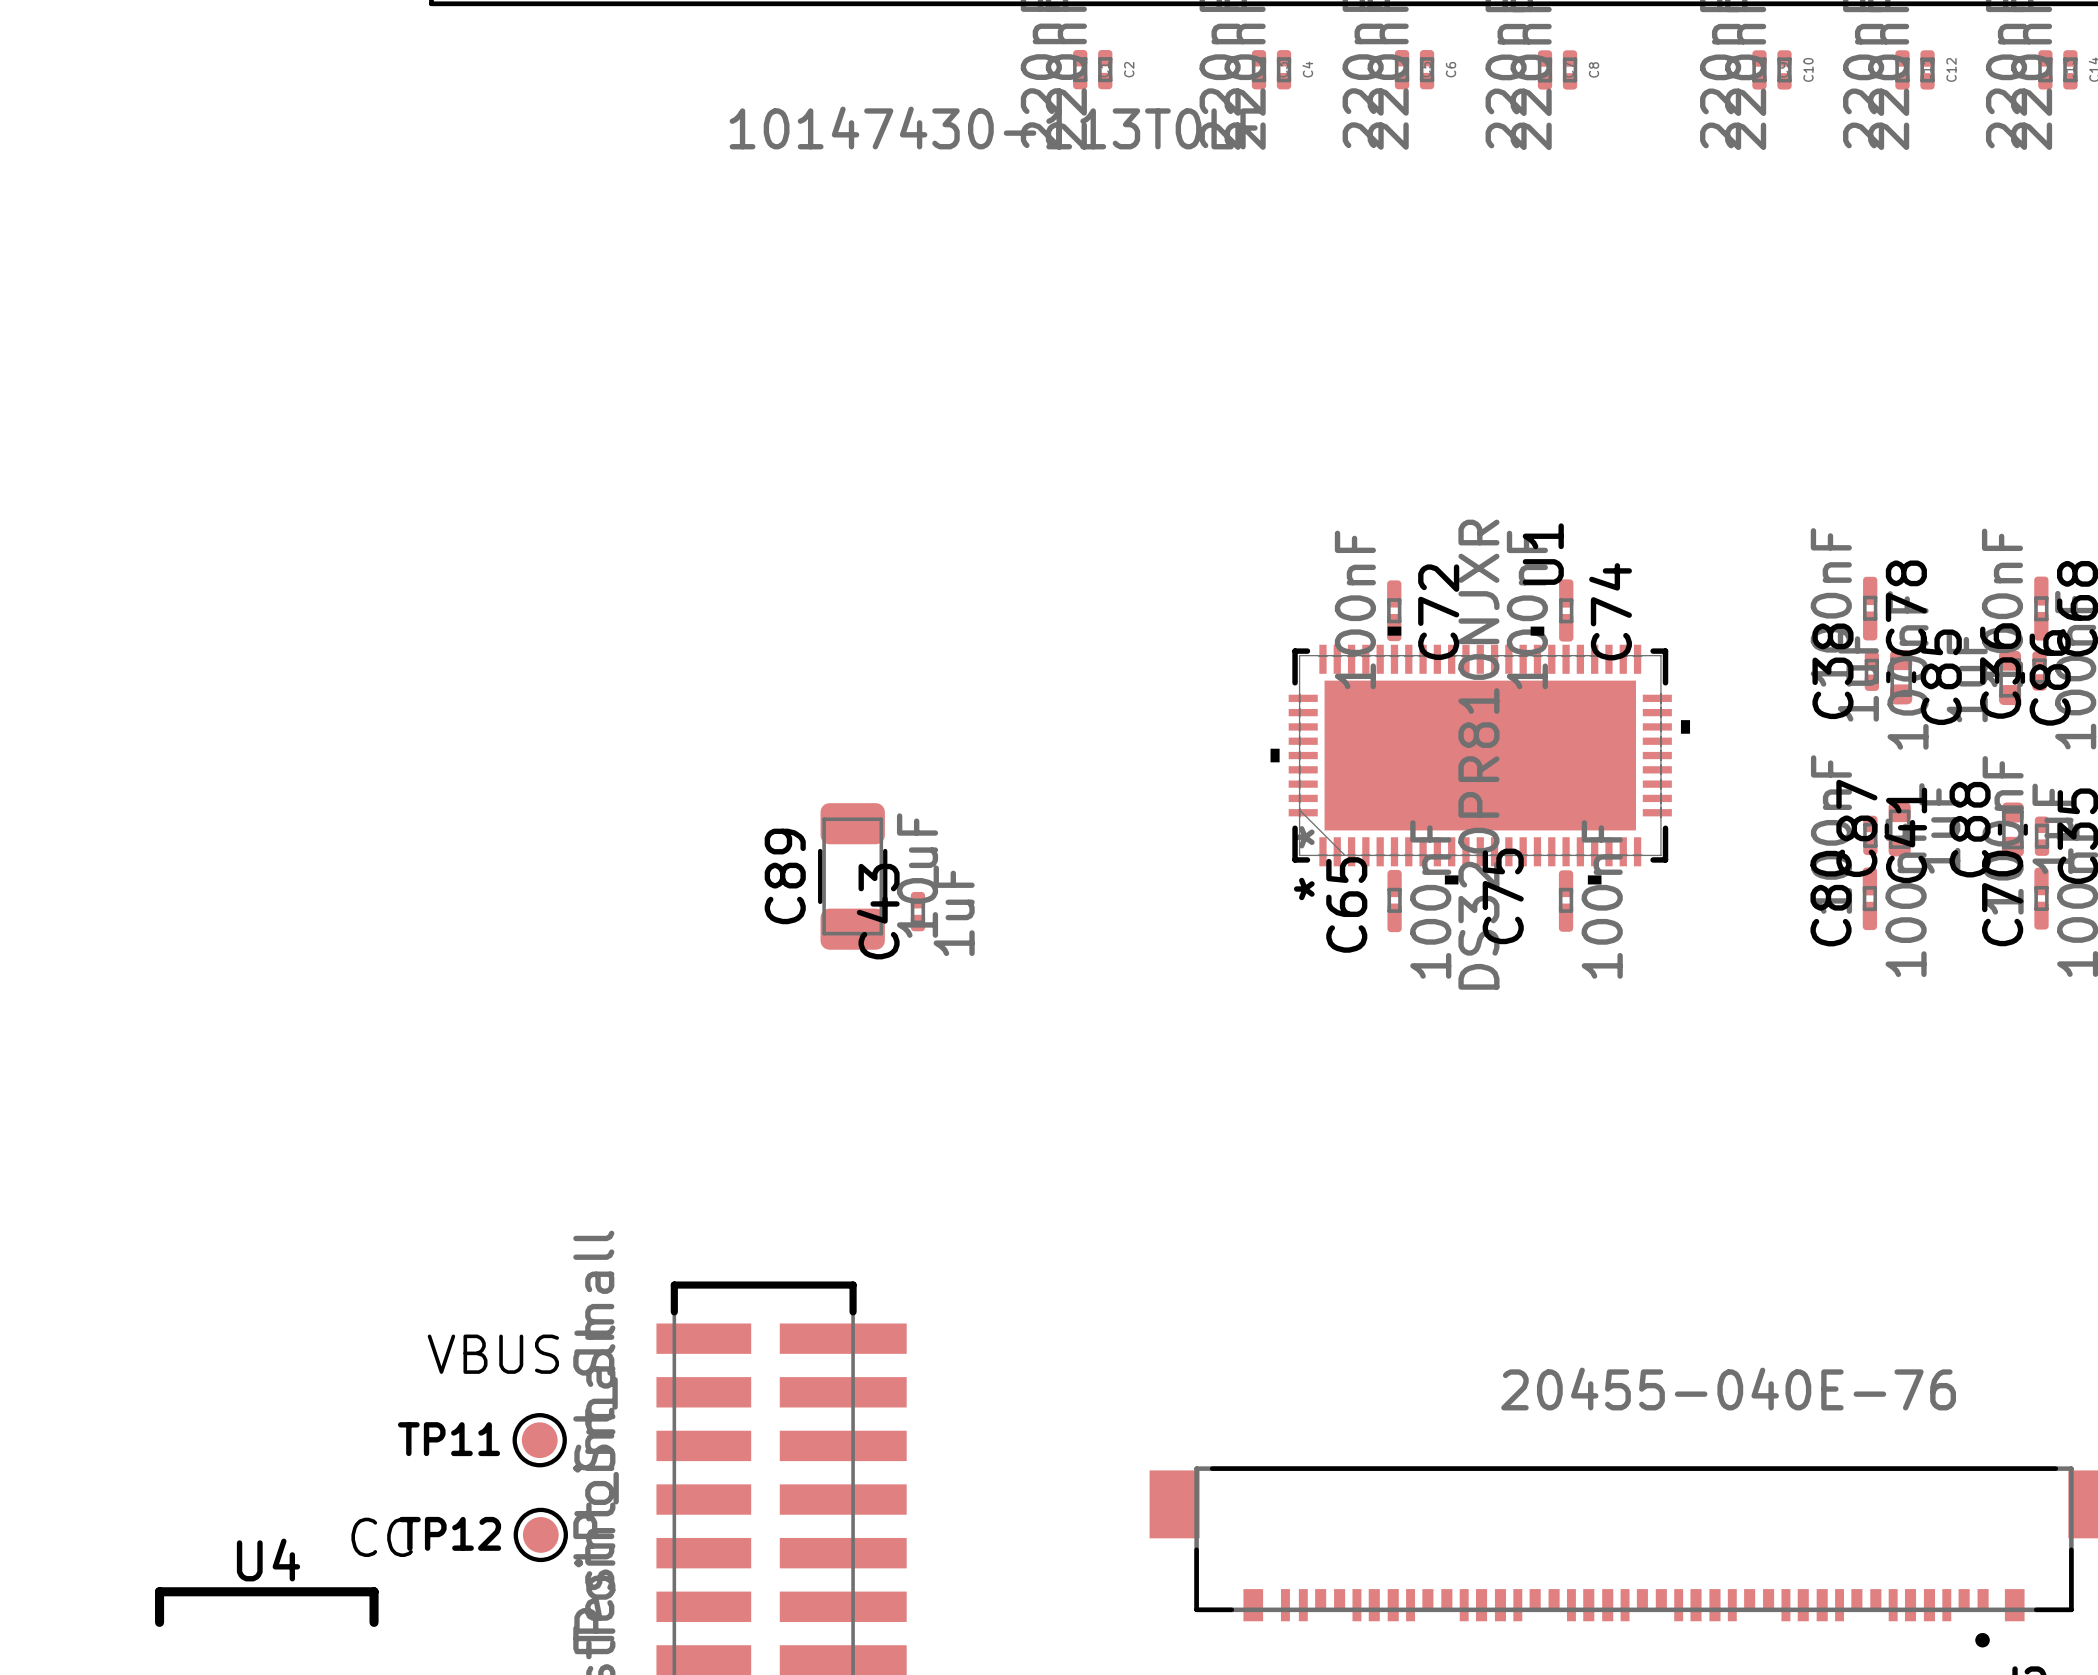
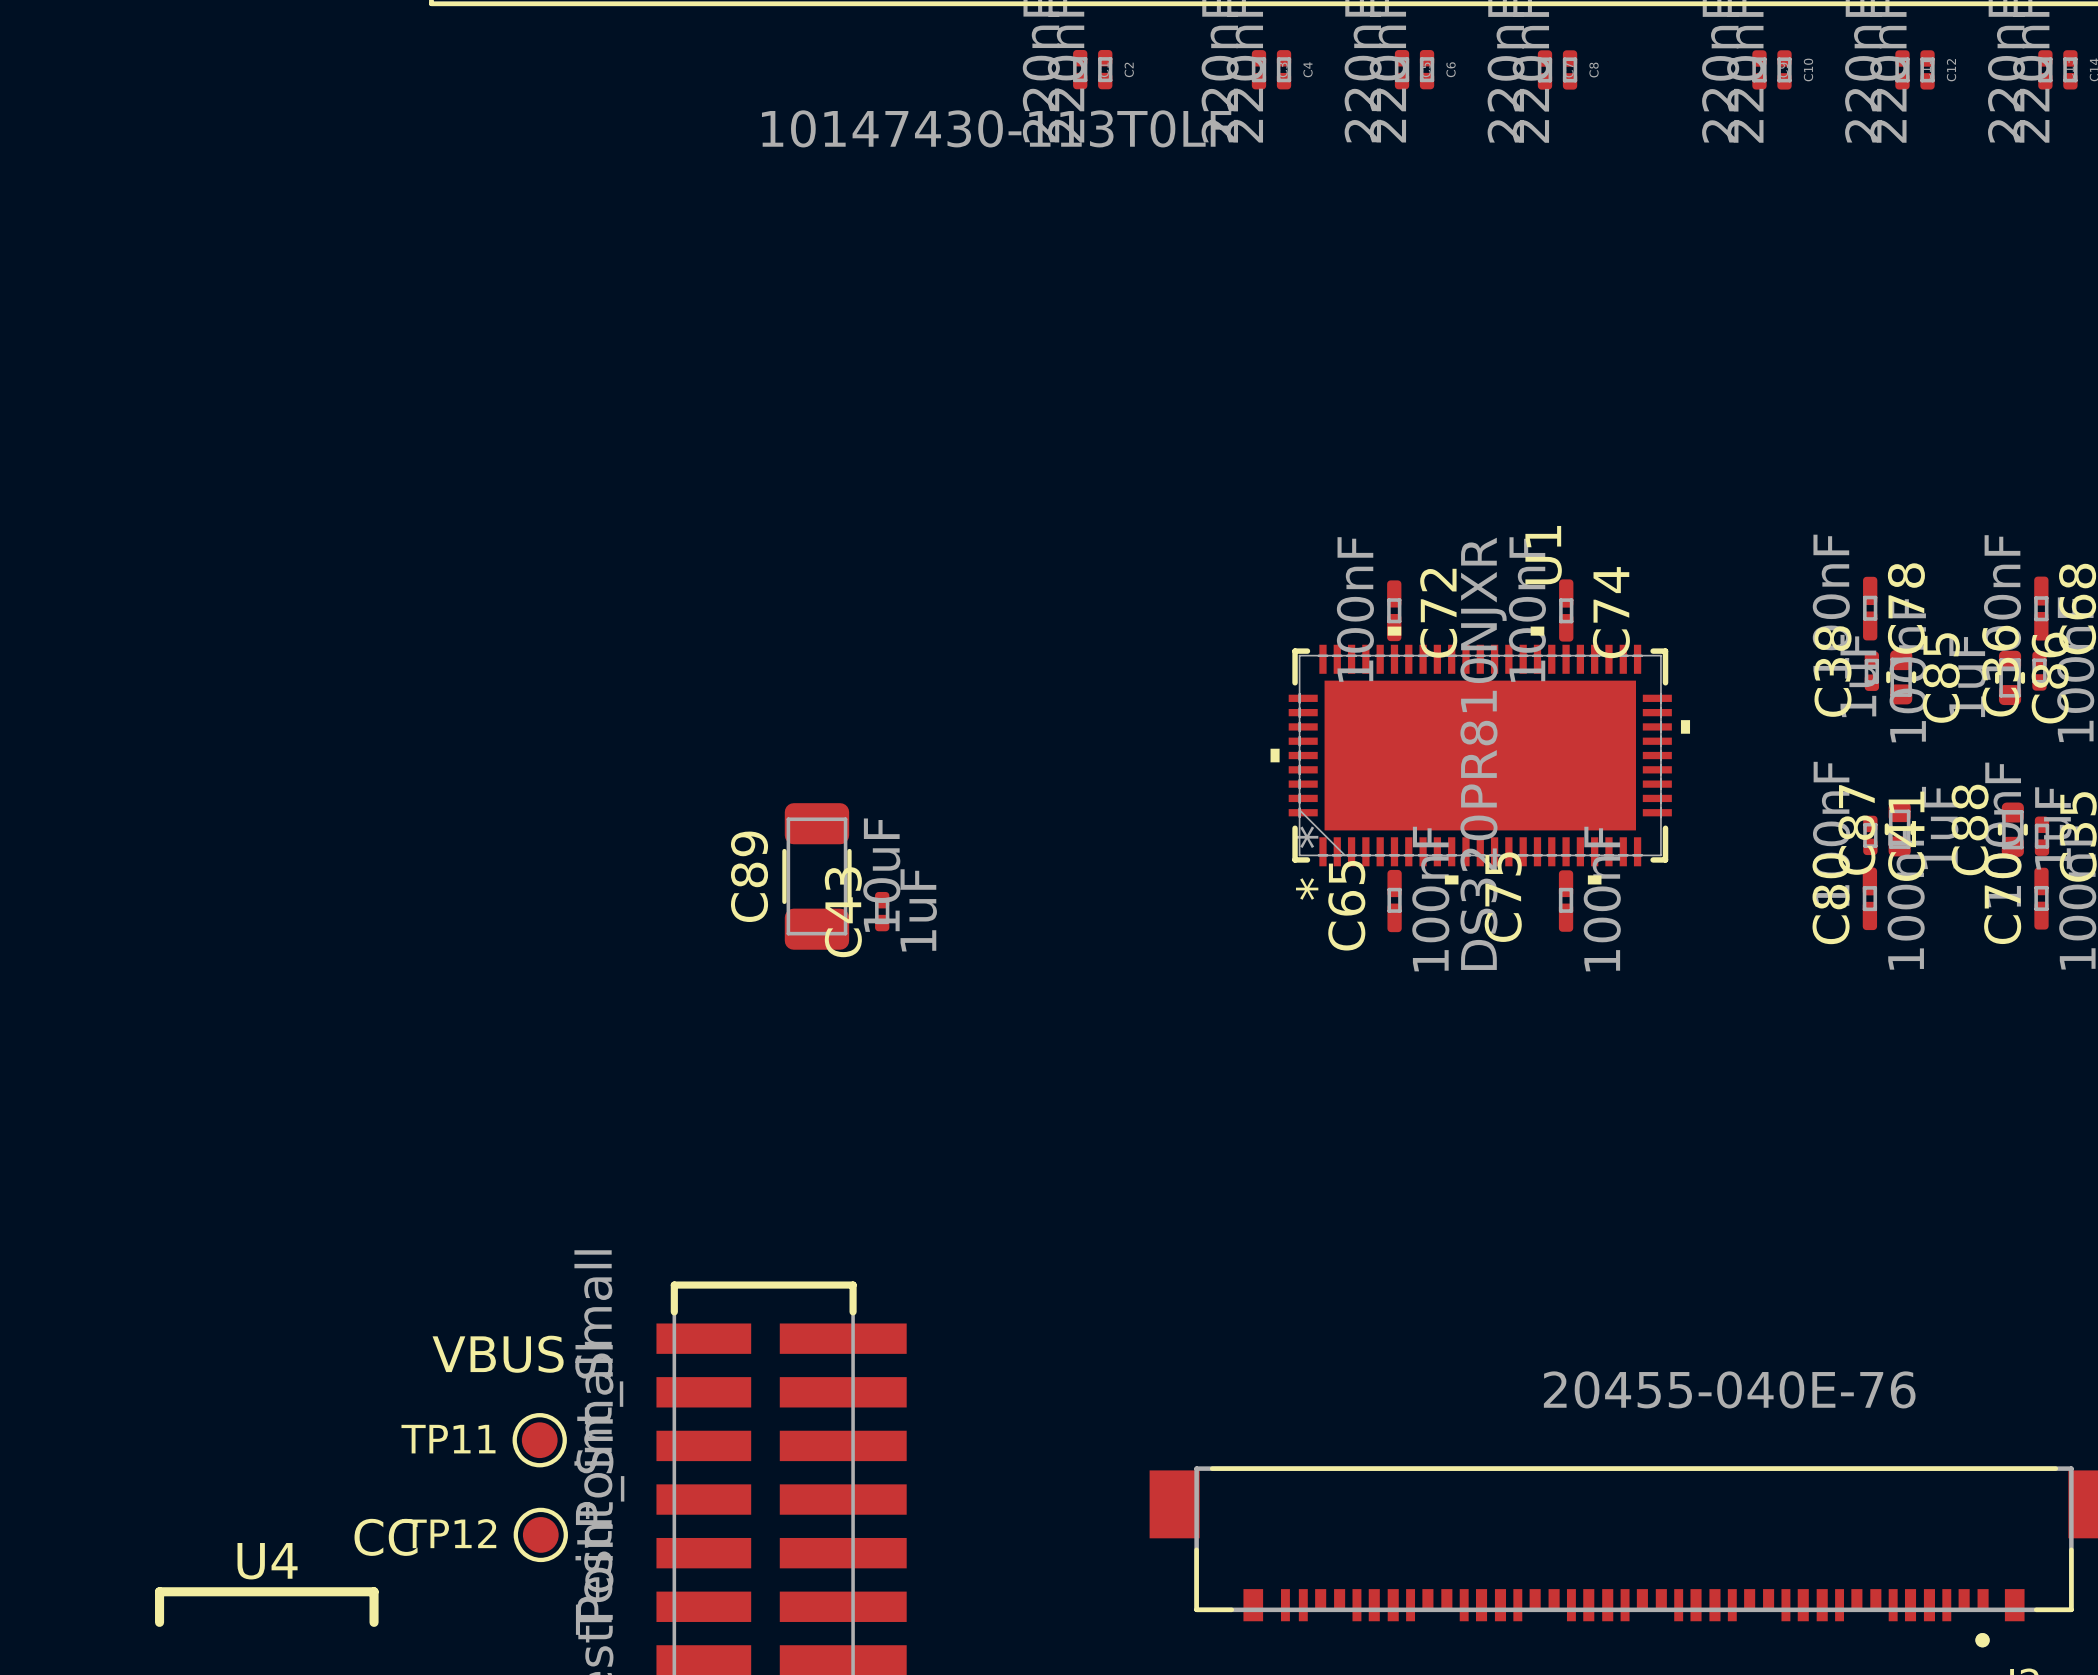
C89 position: (852, 876) -> (816, 876)
C43 position: (917, 911) -> (882, 911)

